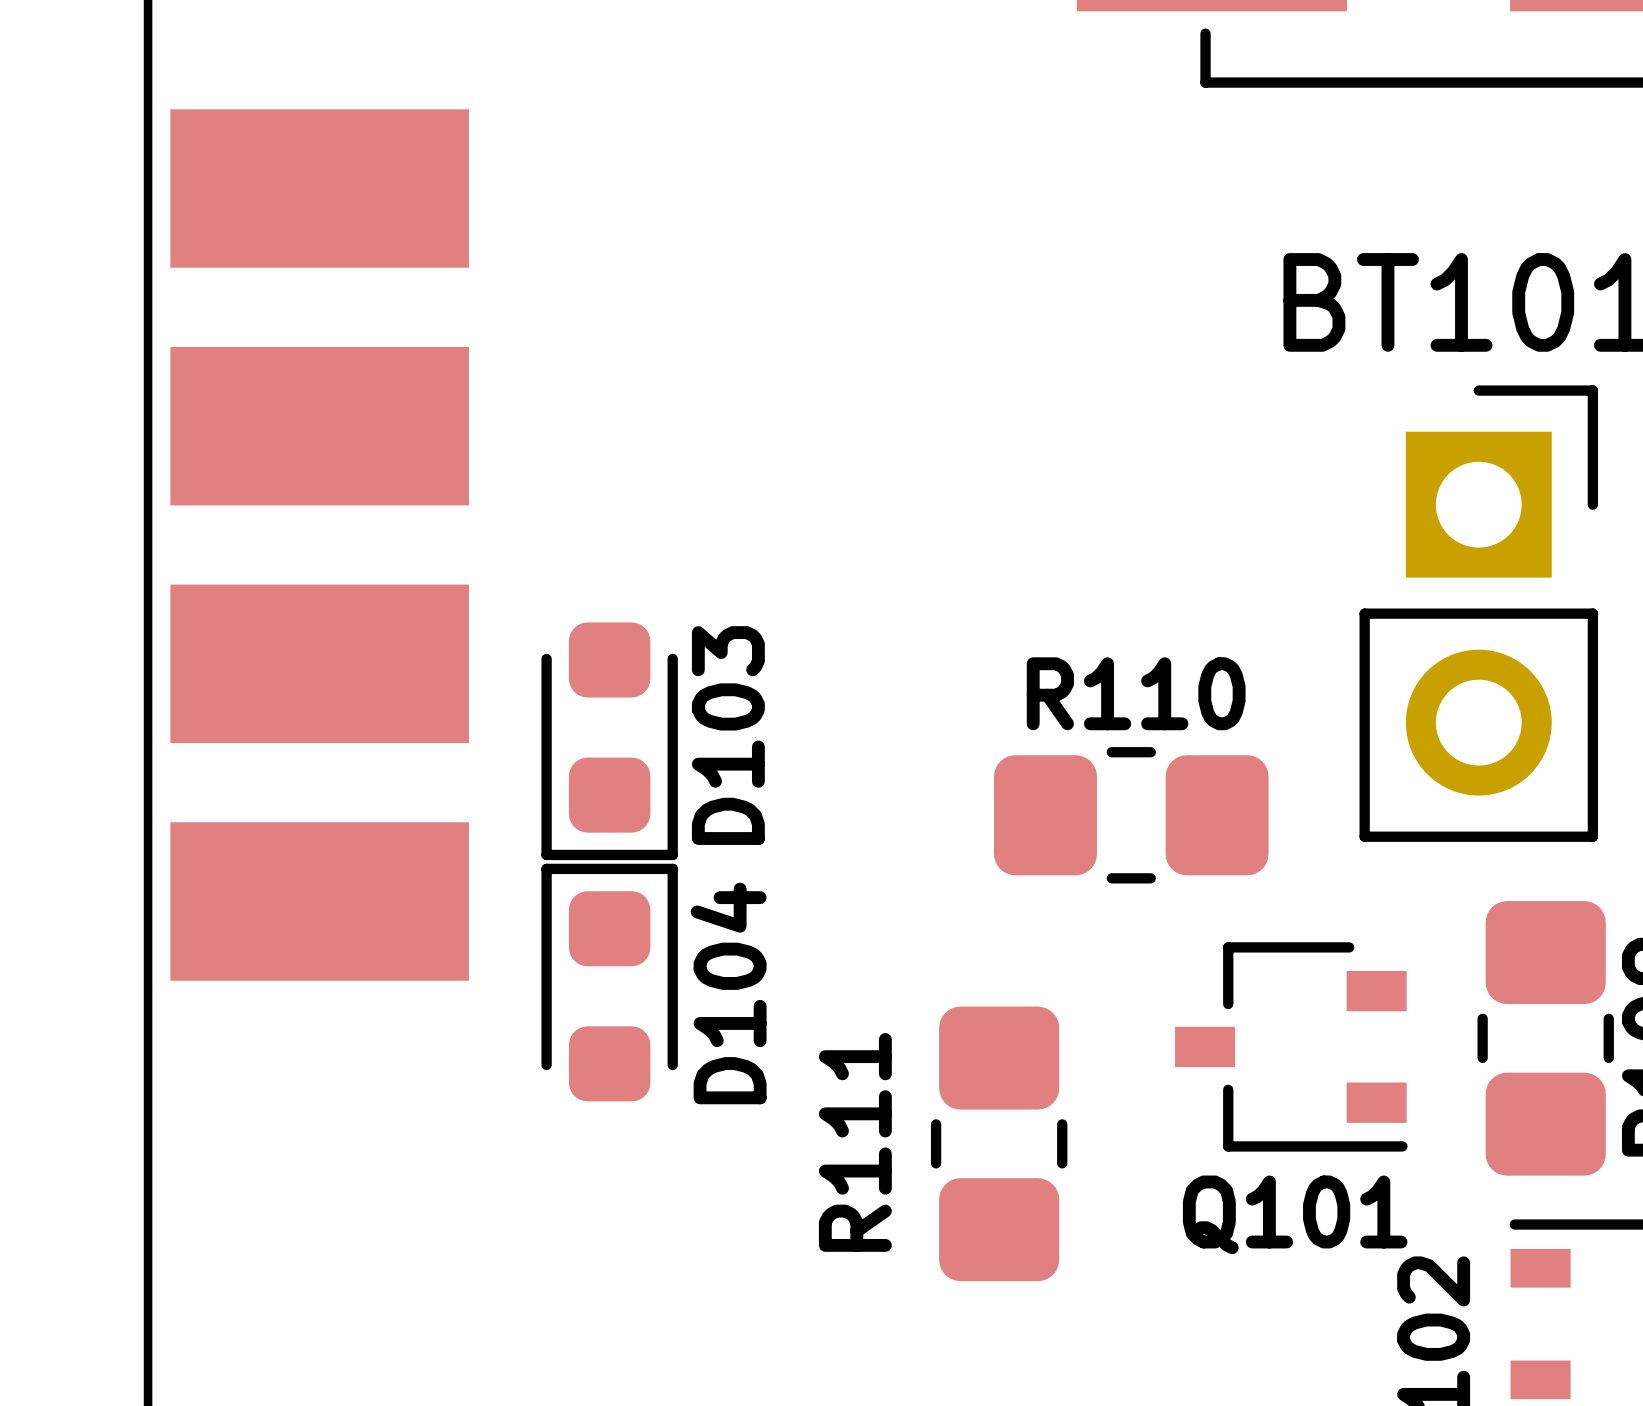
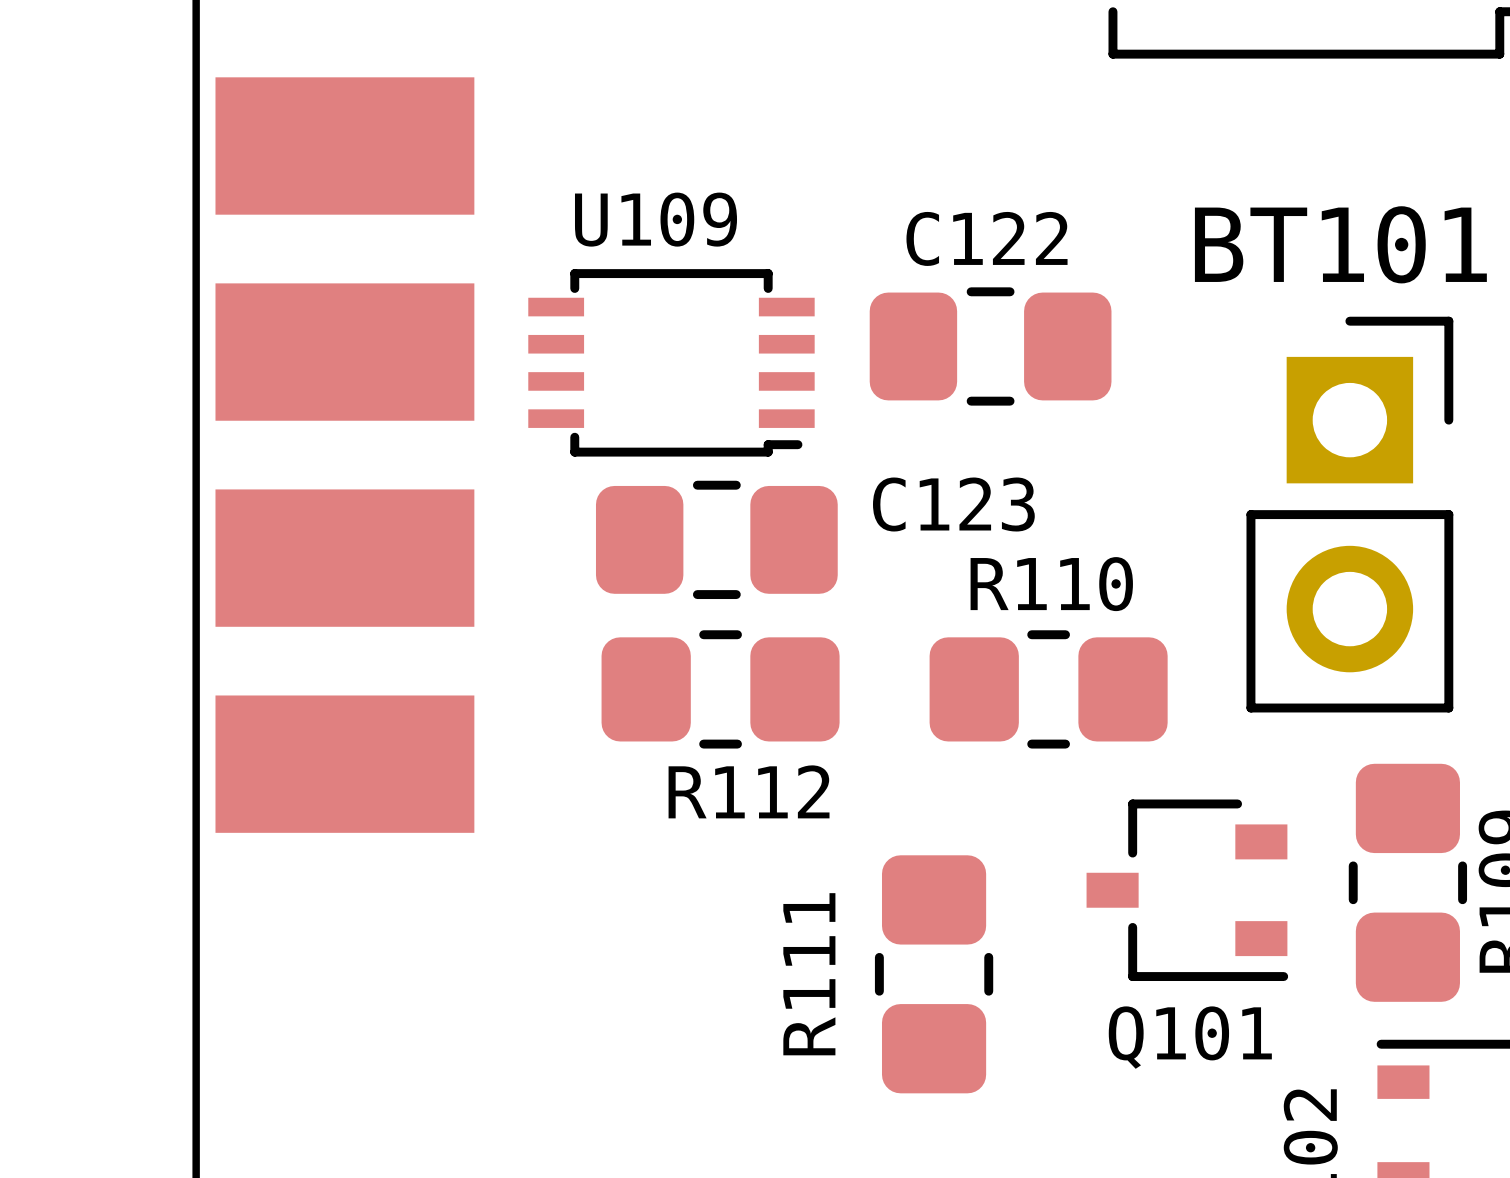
C122: none -> (990, 346)
U109: none -> (671, 362)
C123: none -> (716, 539)
D103: (609, 741) -> none
R112: none -> (720, 689)
D104: (609, 982) -> none

